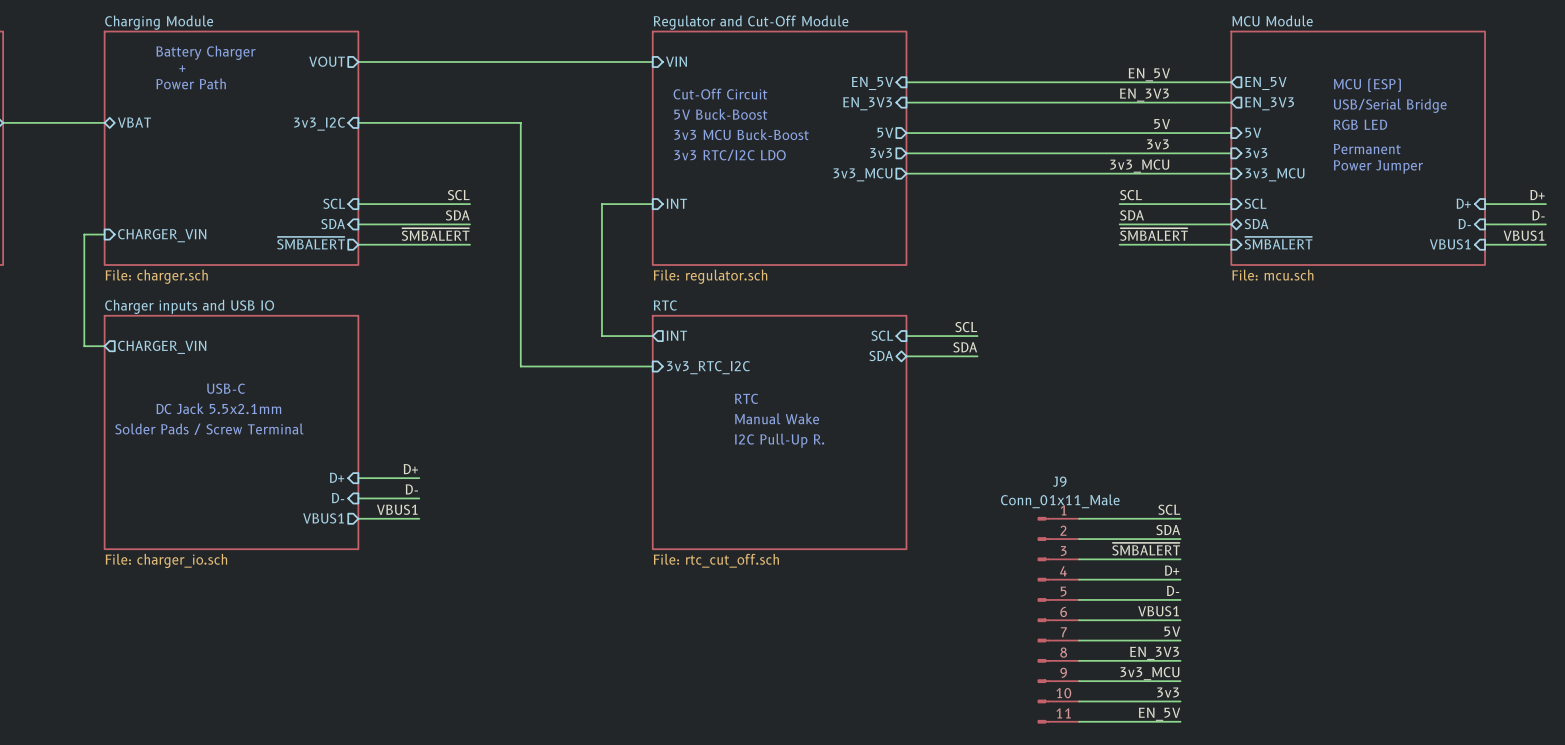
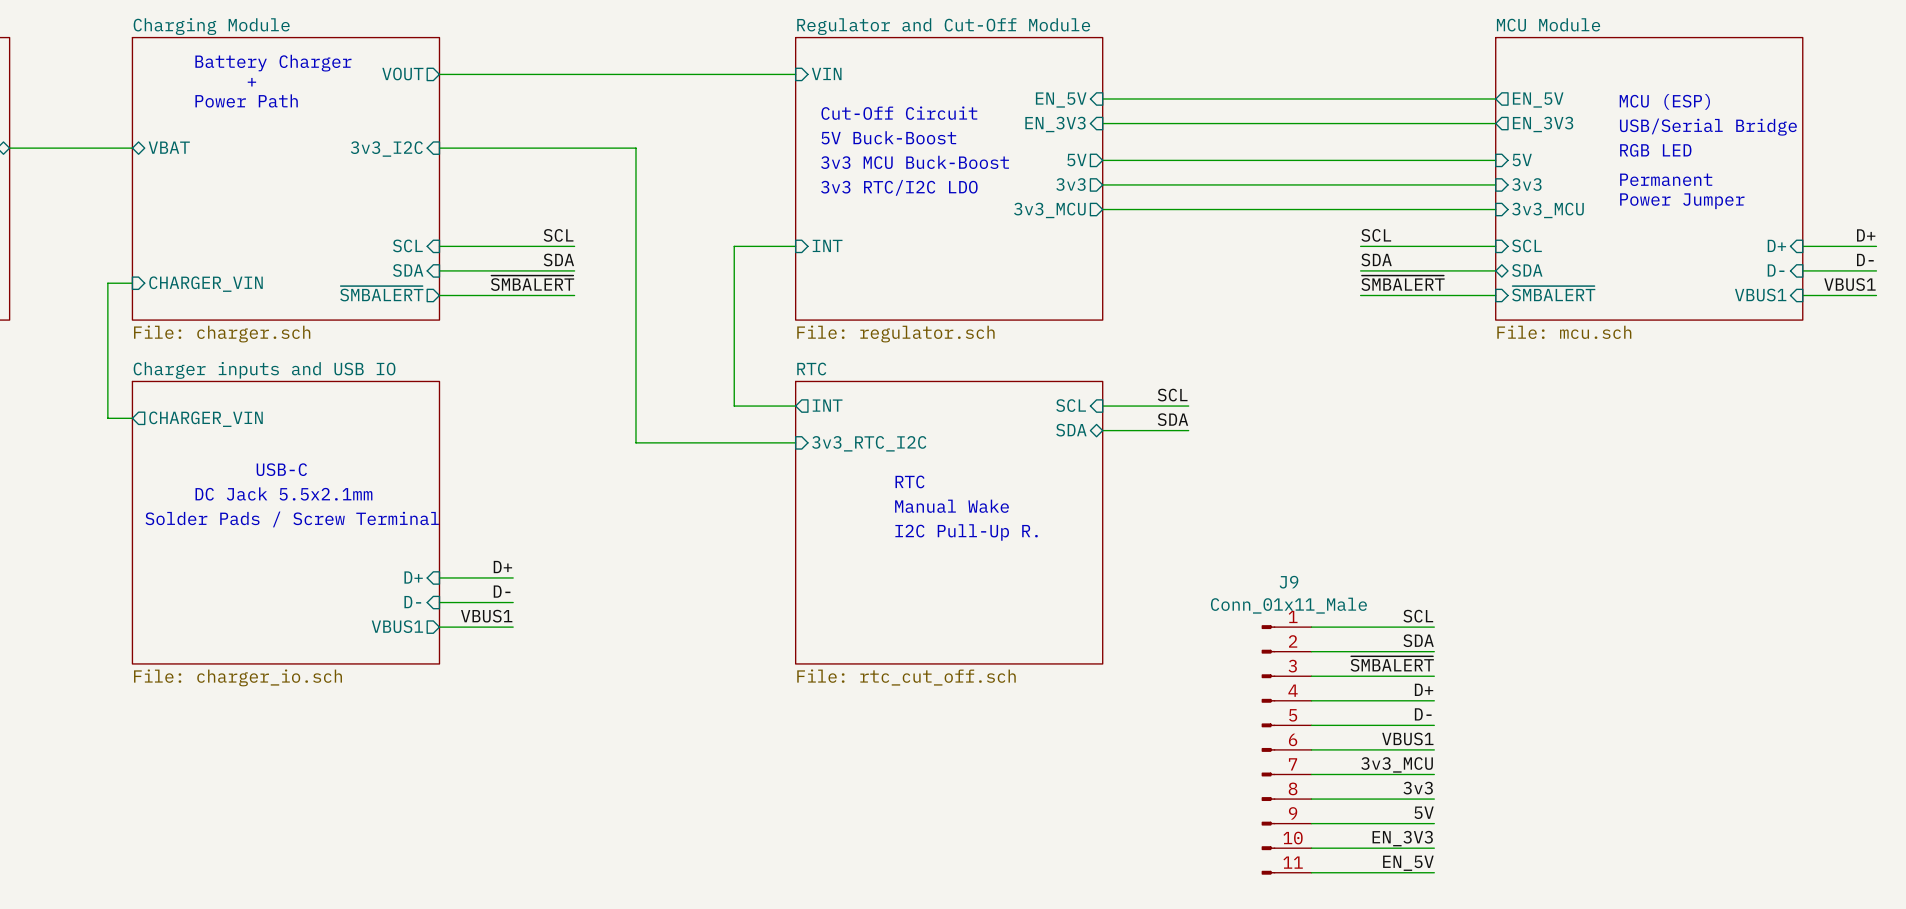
label: EN_5V (1149, 74) -> none
label: EN_3V3 (1144, 95) -> none
label: 5V (1162, 124) -> none
label: 3v3 (1157, 144) -> none
label: 3v3_MCU (1139, 166) -> none
label: 5V (1172, 631) -> 3v3_MCU (1397, 764)
label: EN_3V3 (1154, 653) -> 3v3 (1418, 788)
label: 3v3_MCU (1149, 673) -> 5V (1424, 812)
label: 3v3 (1168, 692) -> EN_3V3 (1402, 838)

